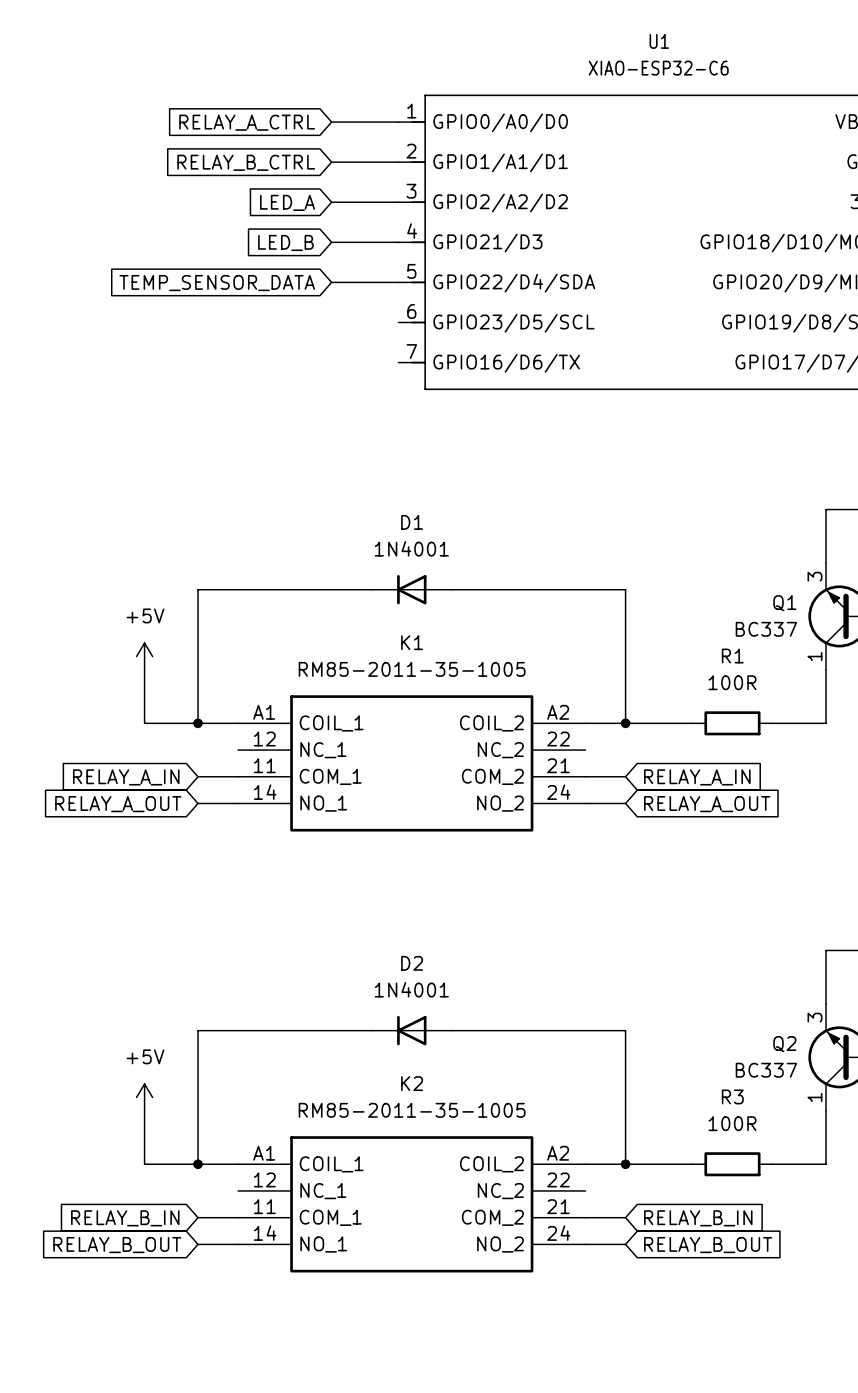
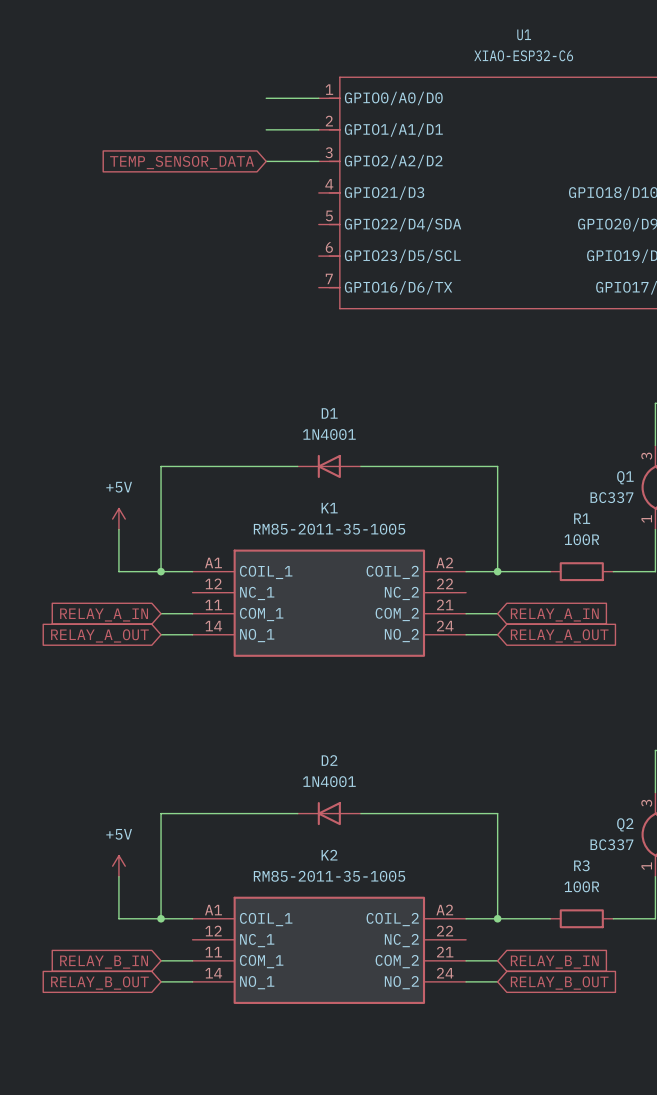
global label: RELAY_A_CTRL (247, 122) -> none
global label: RELAY_B_CTRL (246, 162) -> none
global label: LED_A (287, 202) -> TEMP_SENSOR_DATA (182, 162)
global label: LED_B (285, 242) -> none
wire: (331, 242) (398, 242) -> none
wire: (331, 282) (398, 282) -> none
global label: TEMP_SENSOR_DATA (217, 283) -> none

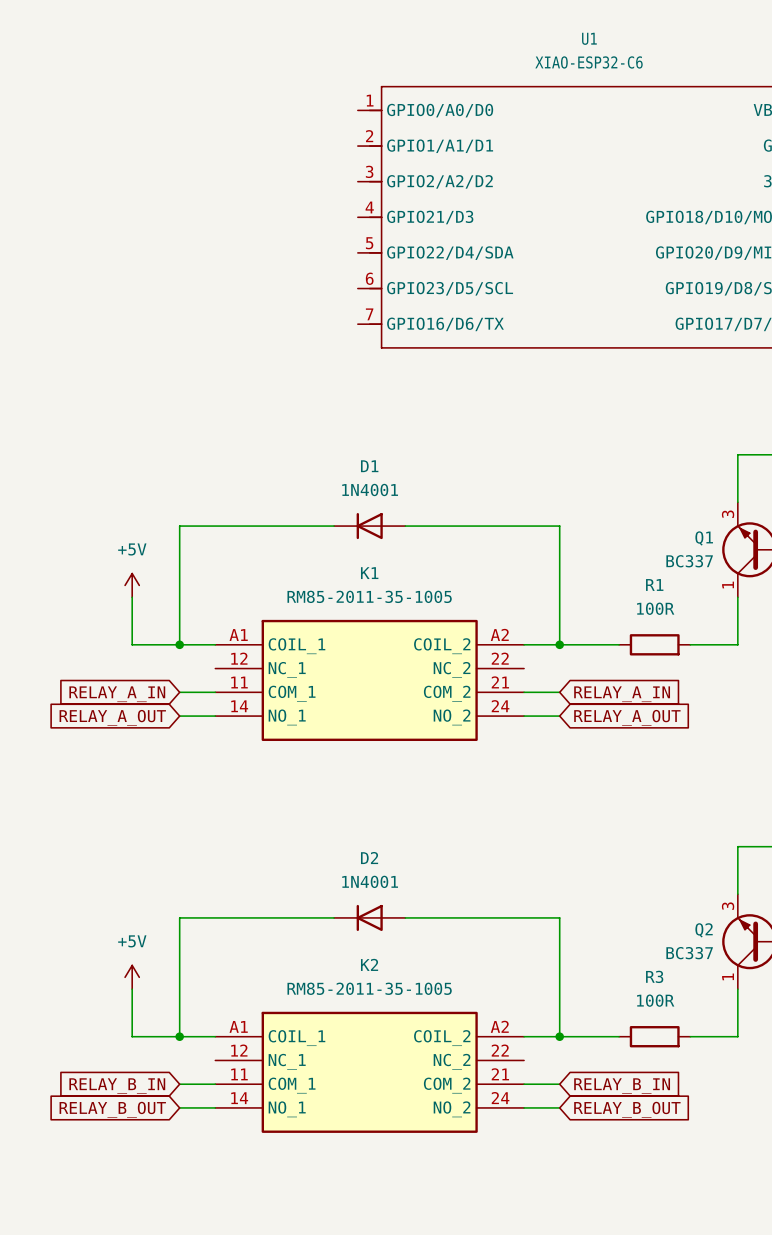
wire: (266, 98) (318, 98) -> none
wire: (266, 129) (318, 129) -> none
wire: (266, 161) (318, 161) -> none
global label: TEMP_SENSOR_DATA (182, 162) -> none

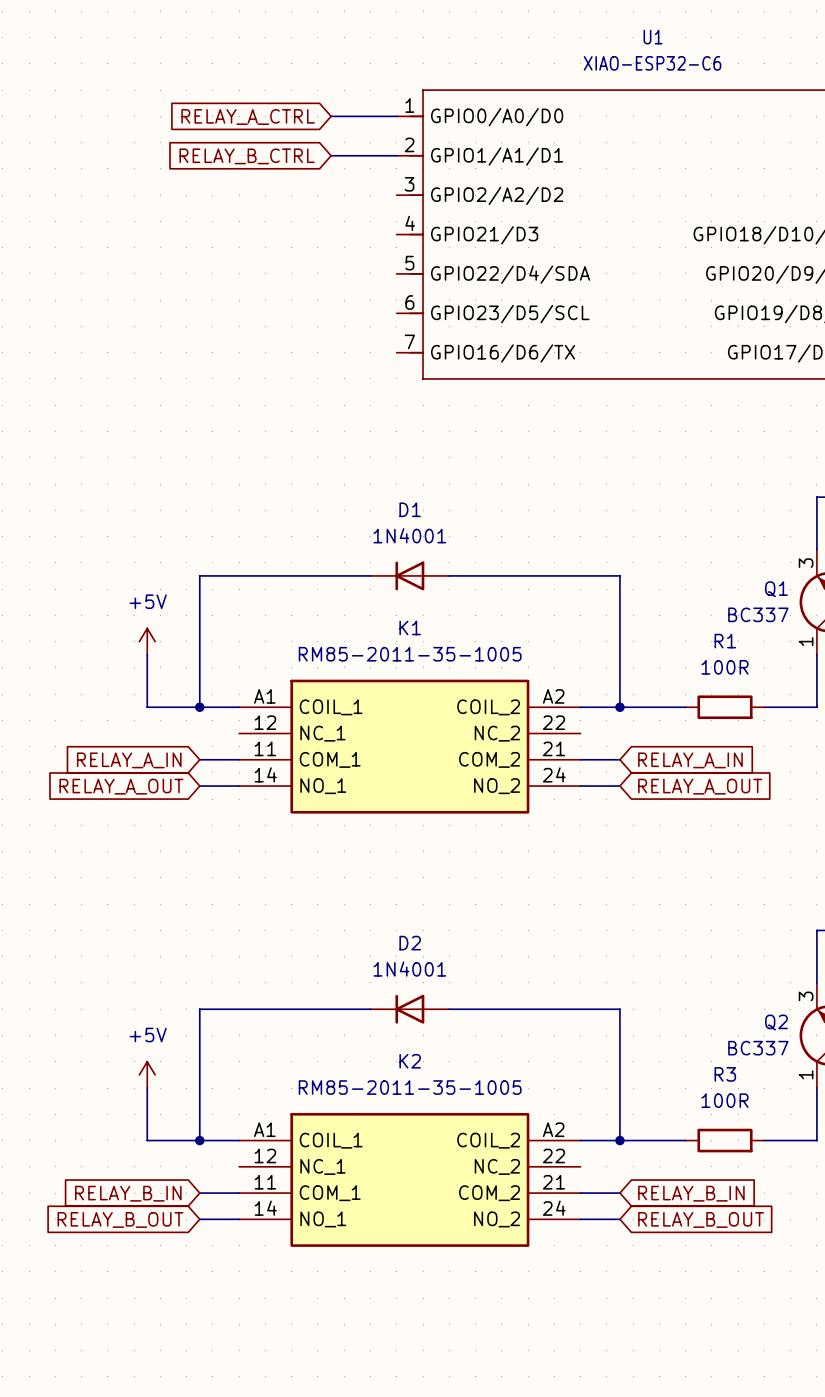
wire: none -> (331, 116) (396, 116)
global label: none -> RELAY_A_CTRL (248, 117)
wire: none -> (331, 155) (396, 155)
global label: none -> RELAY_B_CTRL (247, 156)

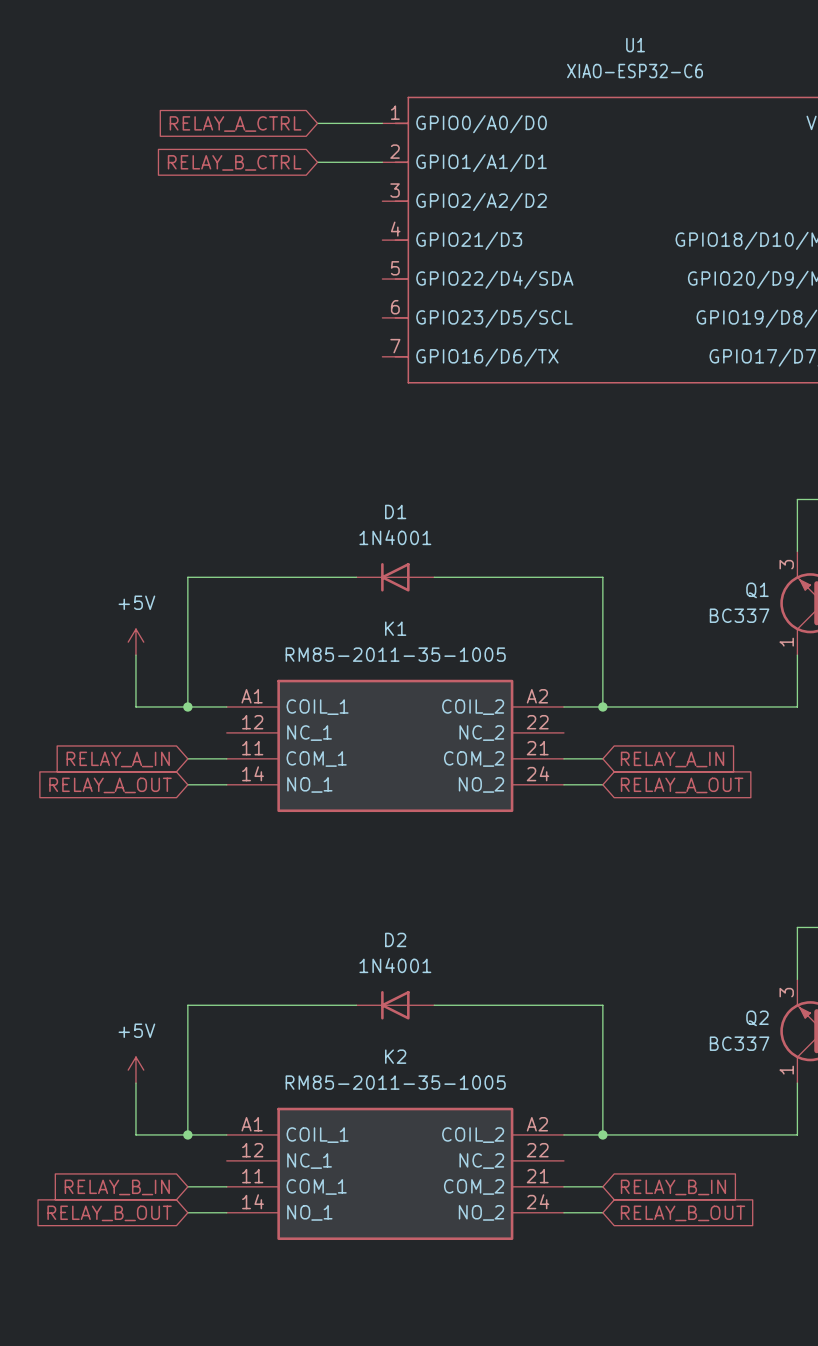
wire: none -> (667, 706) (745, 706)
R1: 100R (725, 707) -> none
wire: none -> (667, 1134) (745, 1134)
R3: 100R (725, 1140) -> none

